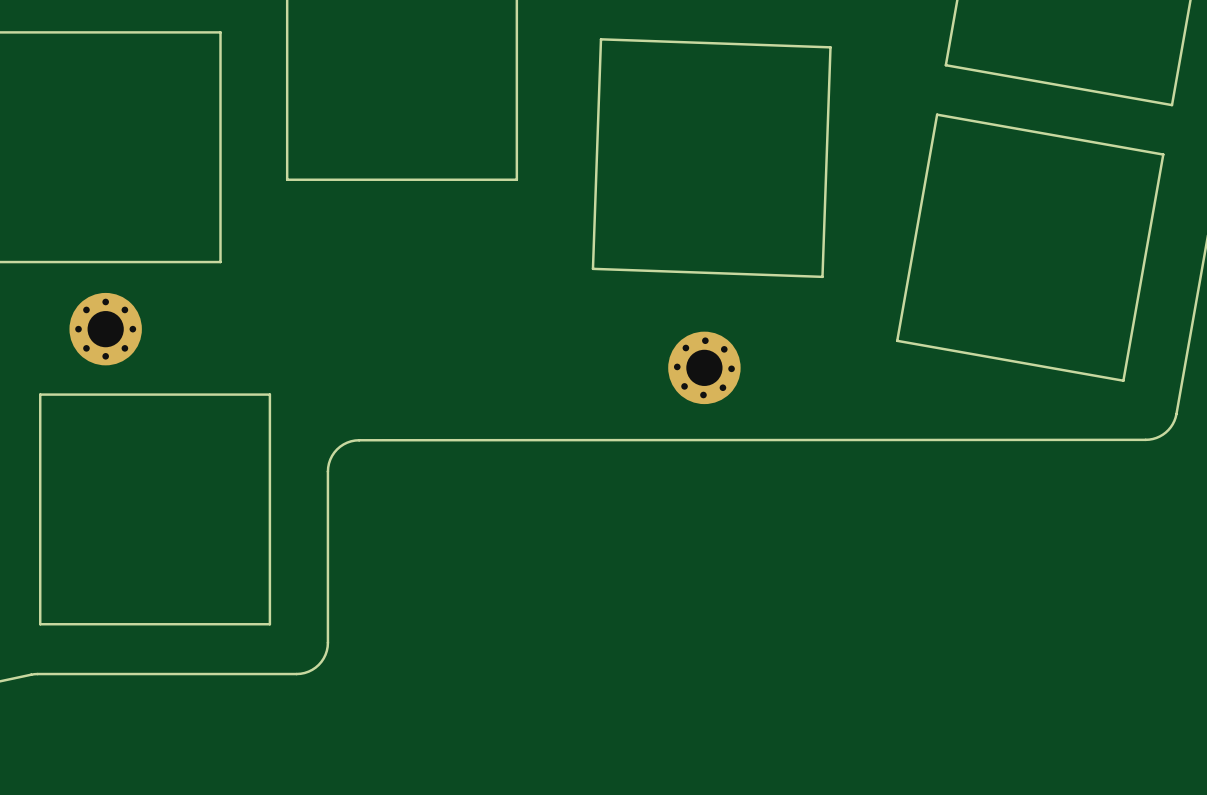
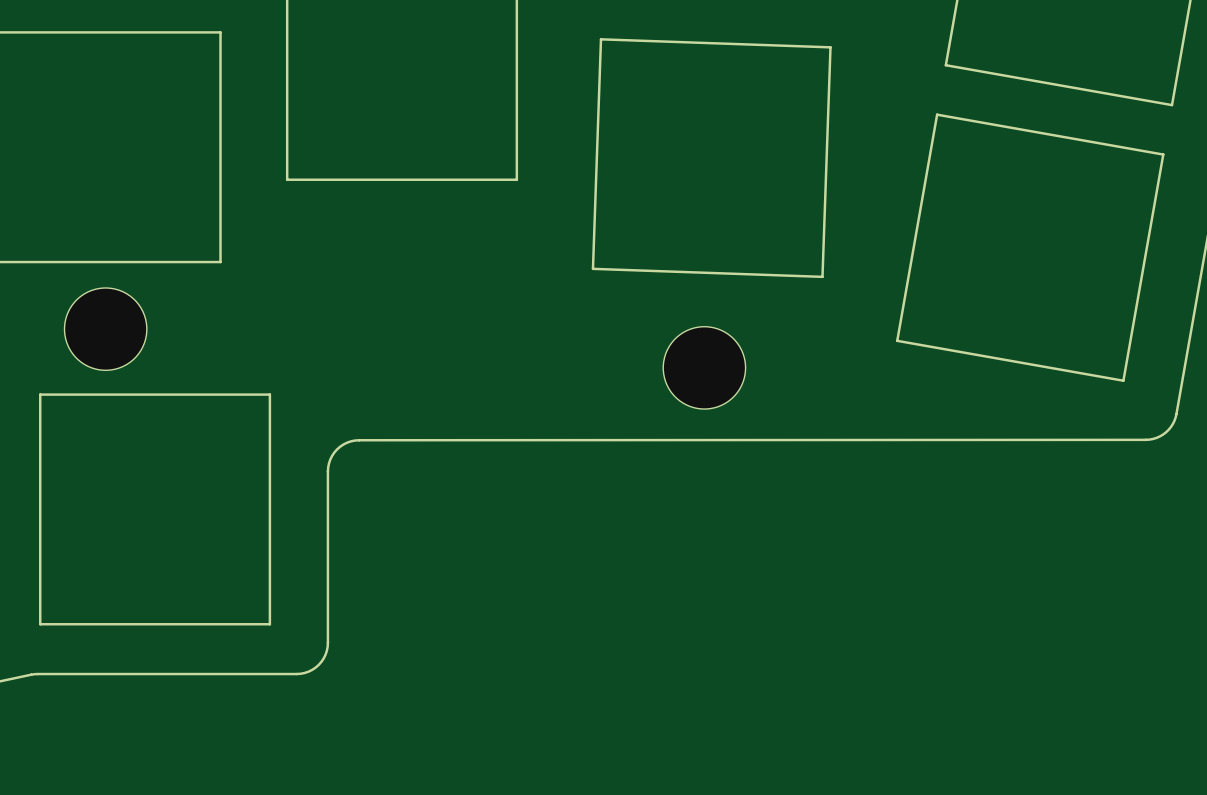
part footprint: [69, 292, 142, 366] -> [64, 287, 147, 371]
part footprint: [668, 331, 741, 405] -> [663, 326, 746, 410]

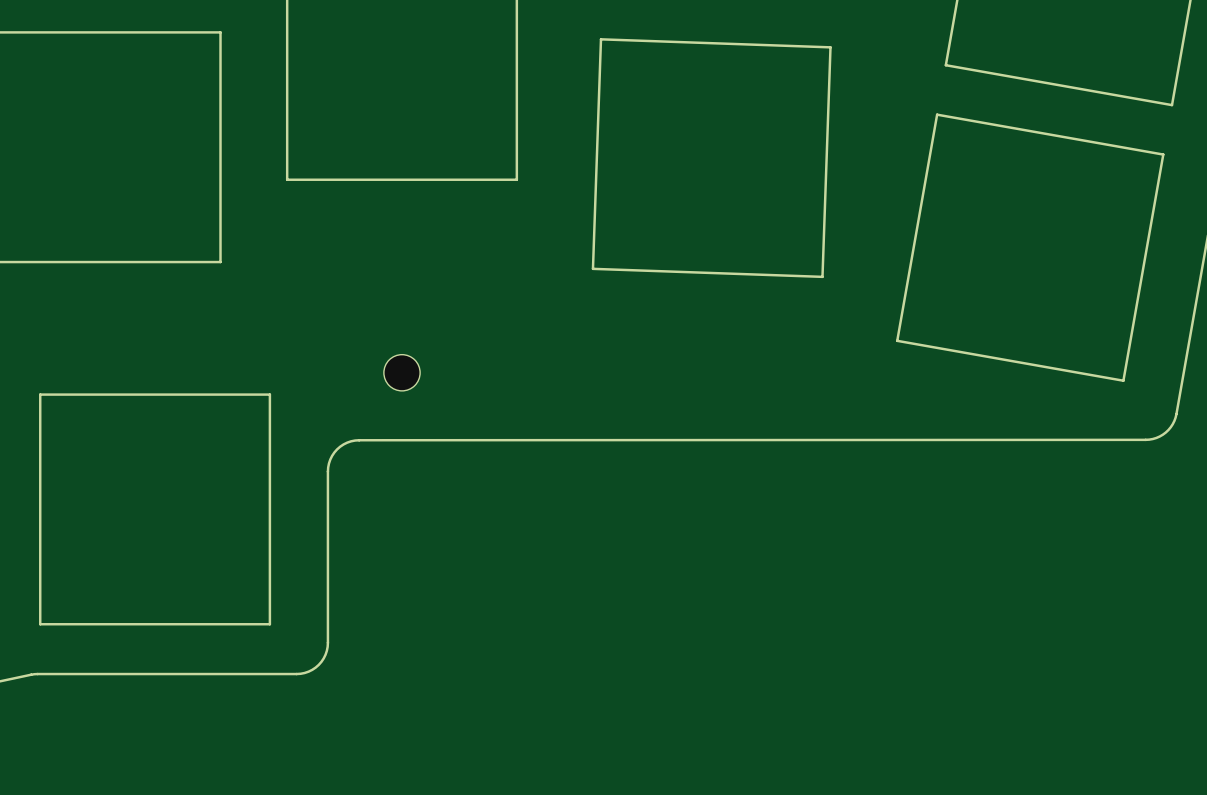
part: (105, 329) -> none
part: (704, 367) -> none
part: none -> (402, 372)

